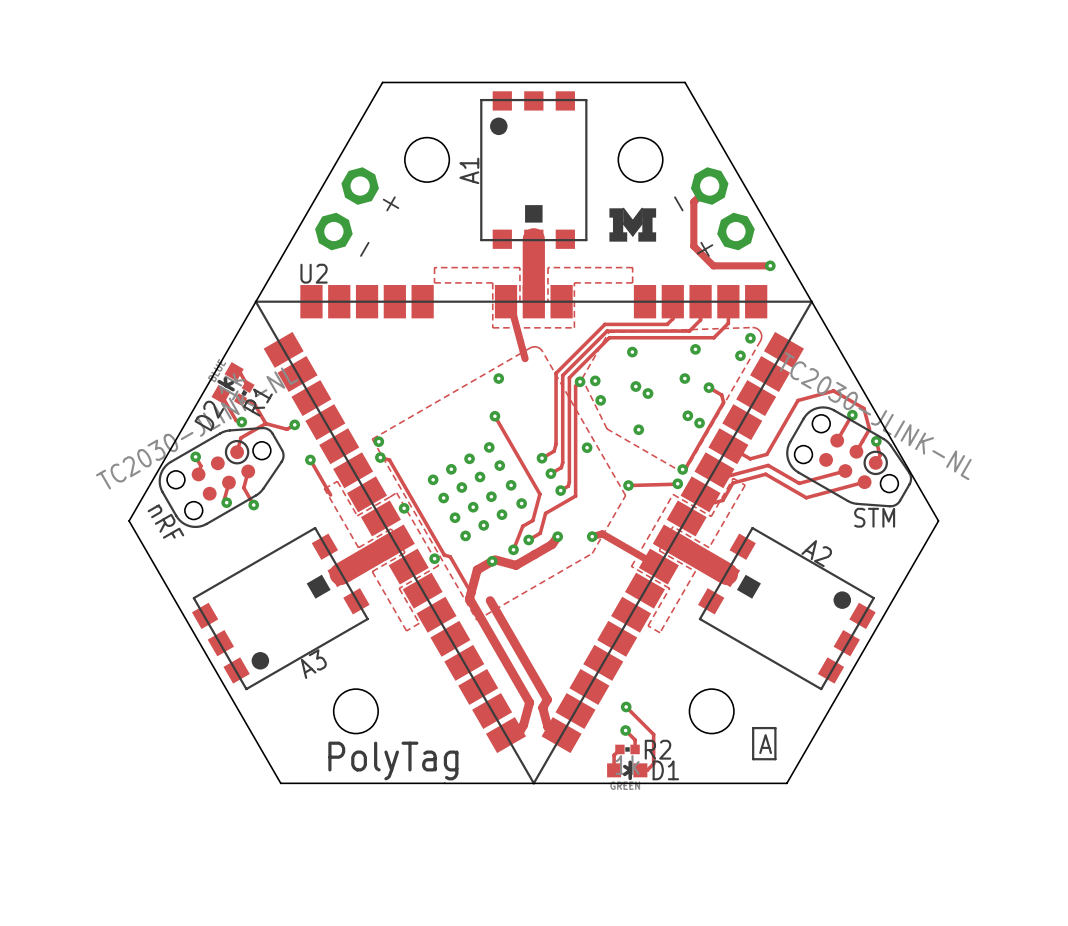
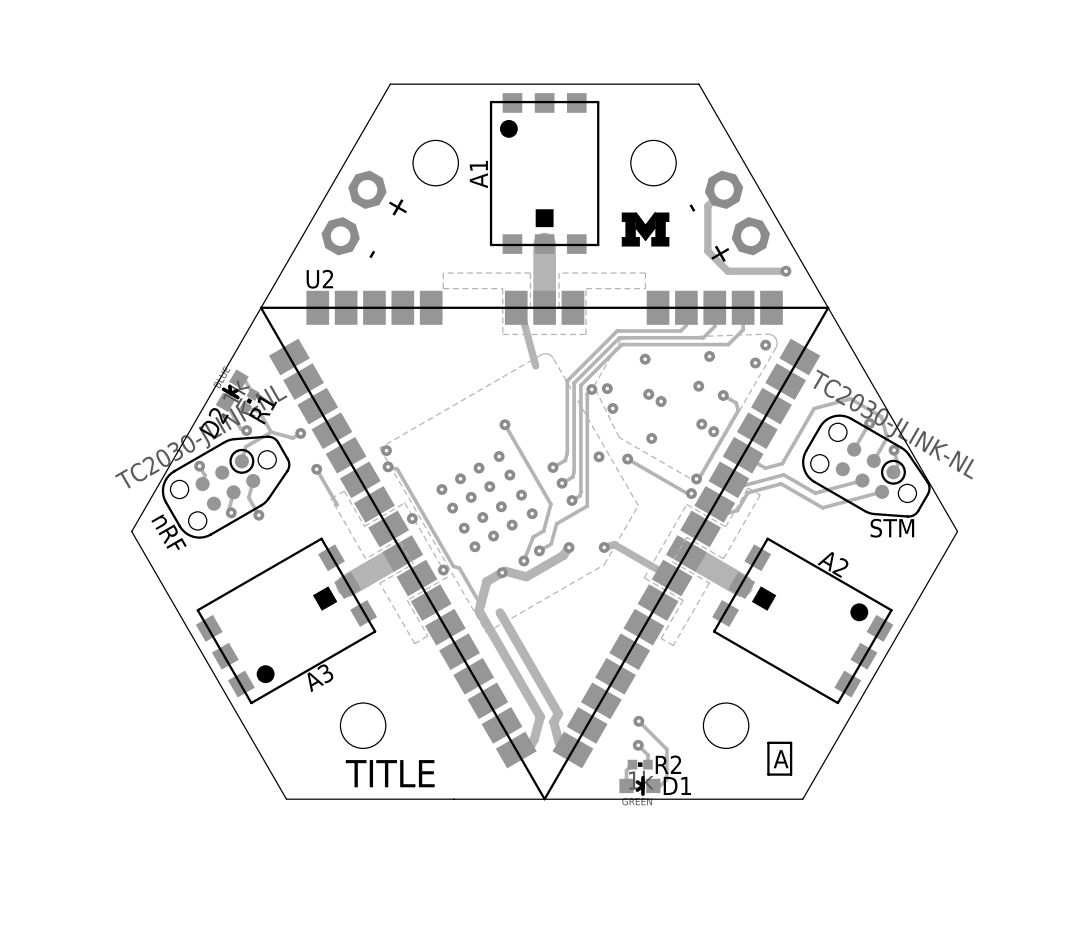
via: (498, 378) -> none
track: (674, 484) (628, 485) -> (688, 494) (627, 459)
via position: (628, 485) -> (627, 459)
text: PolyTag (393, 760) -> TITLE (390, 773)

